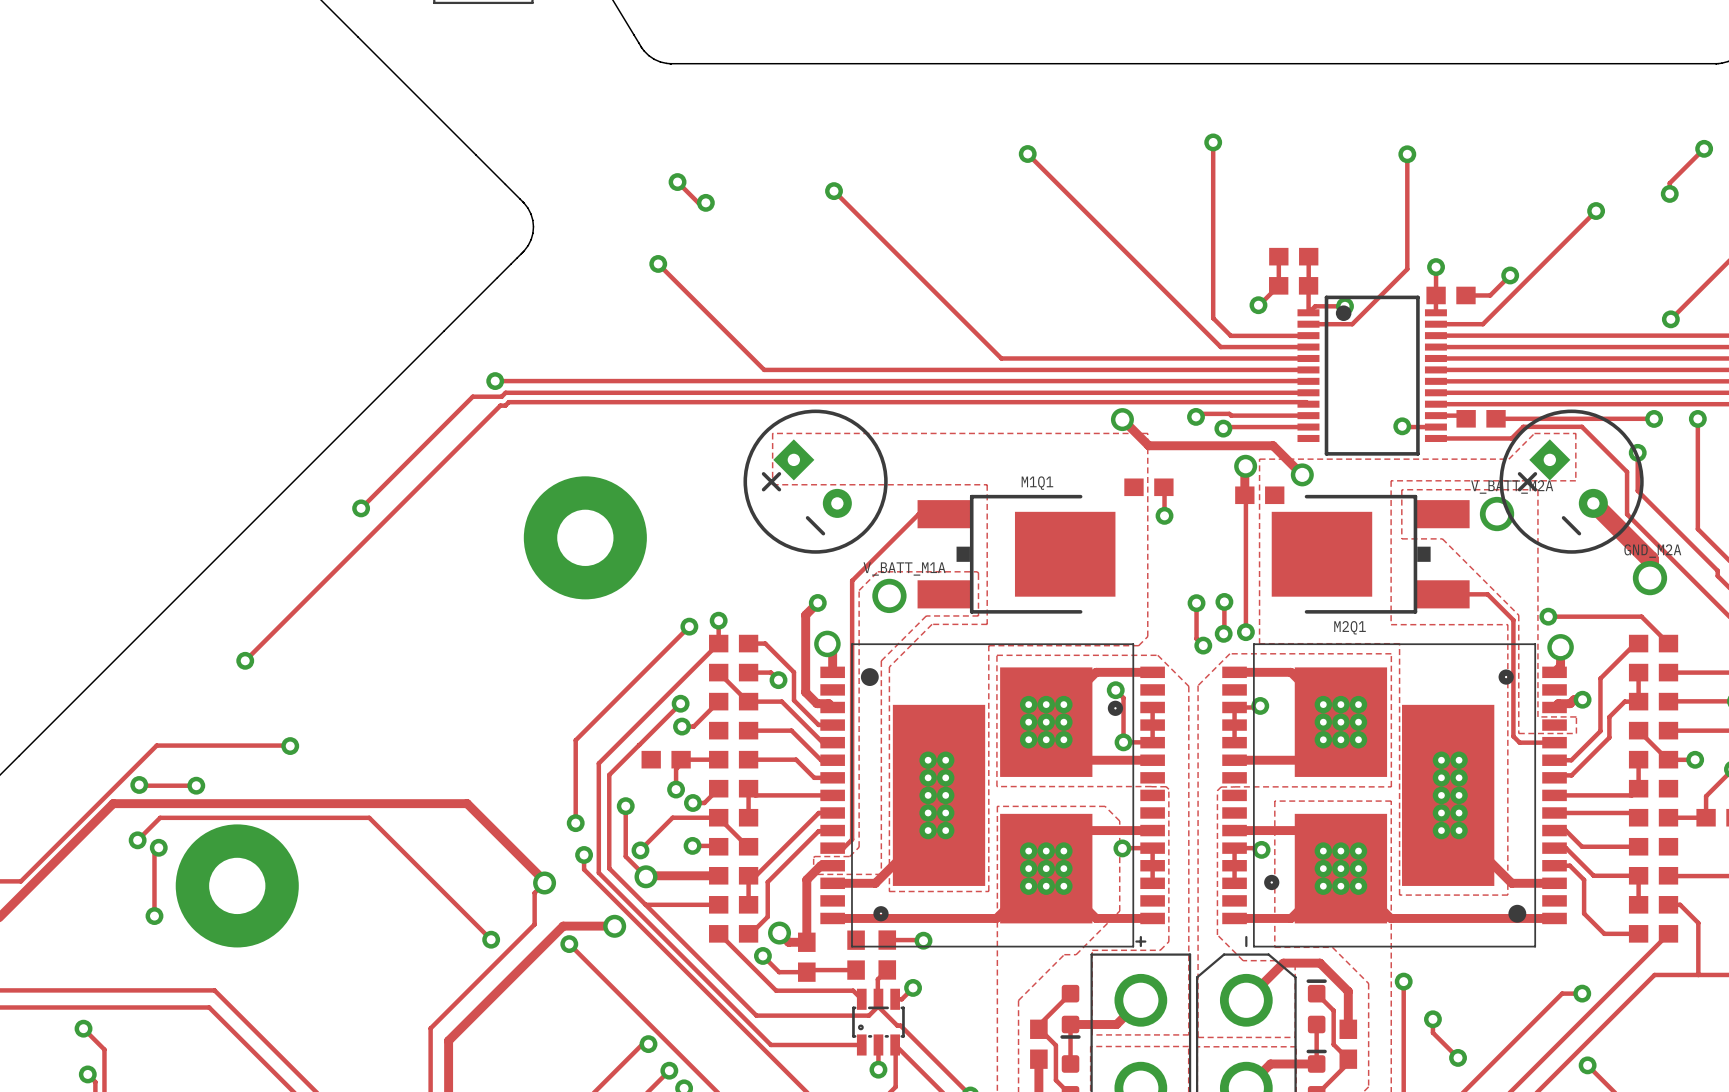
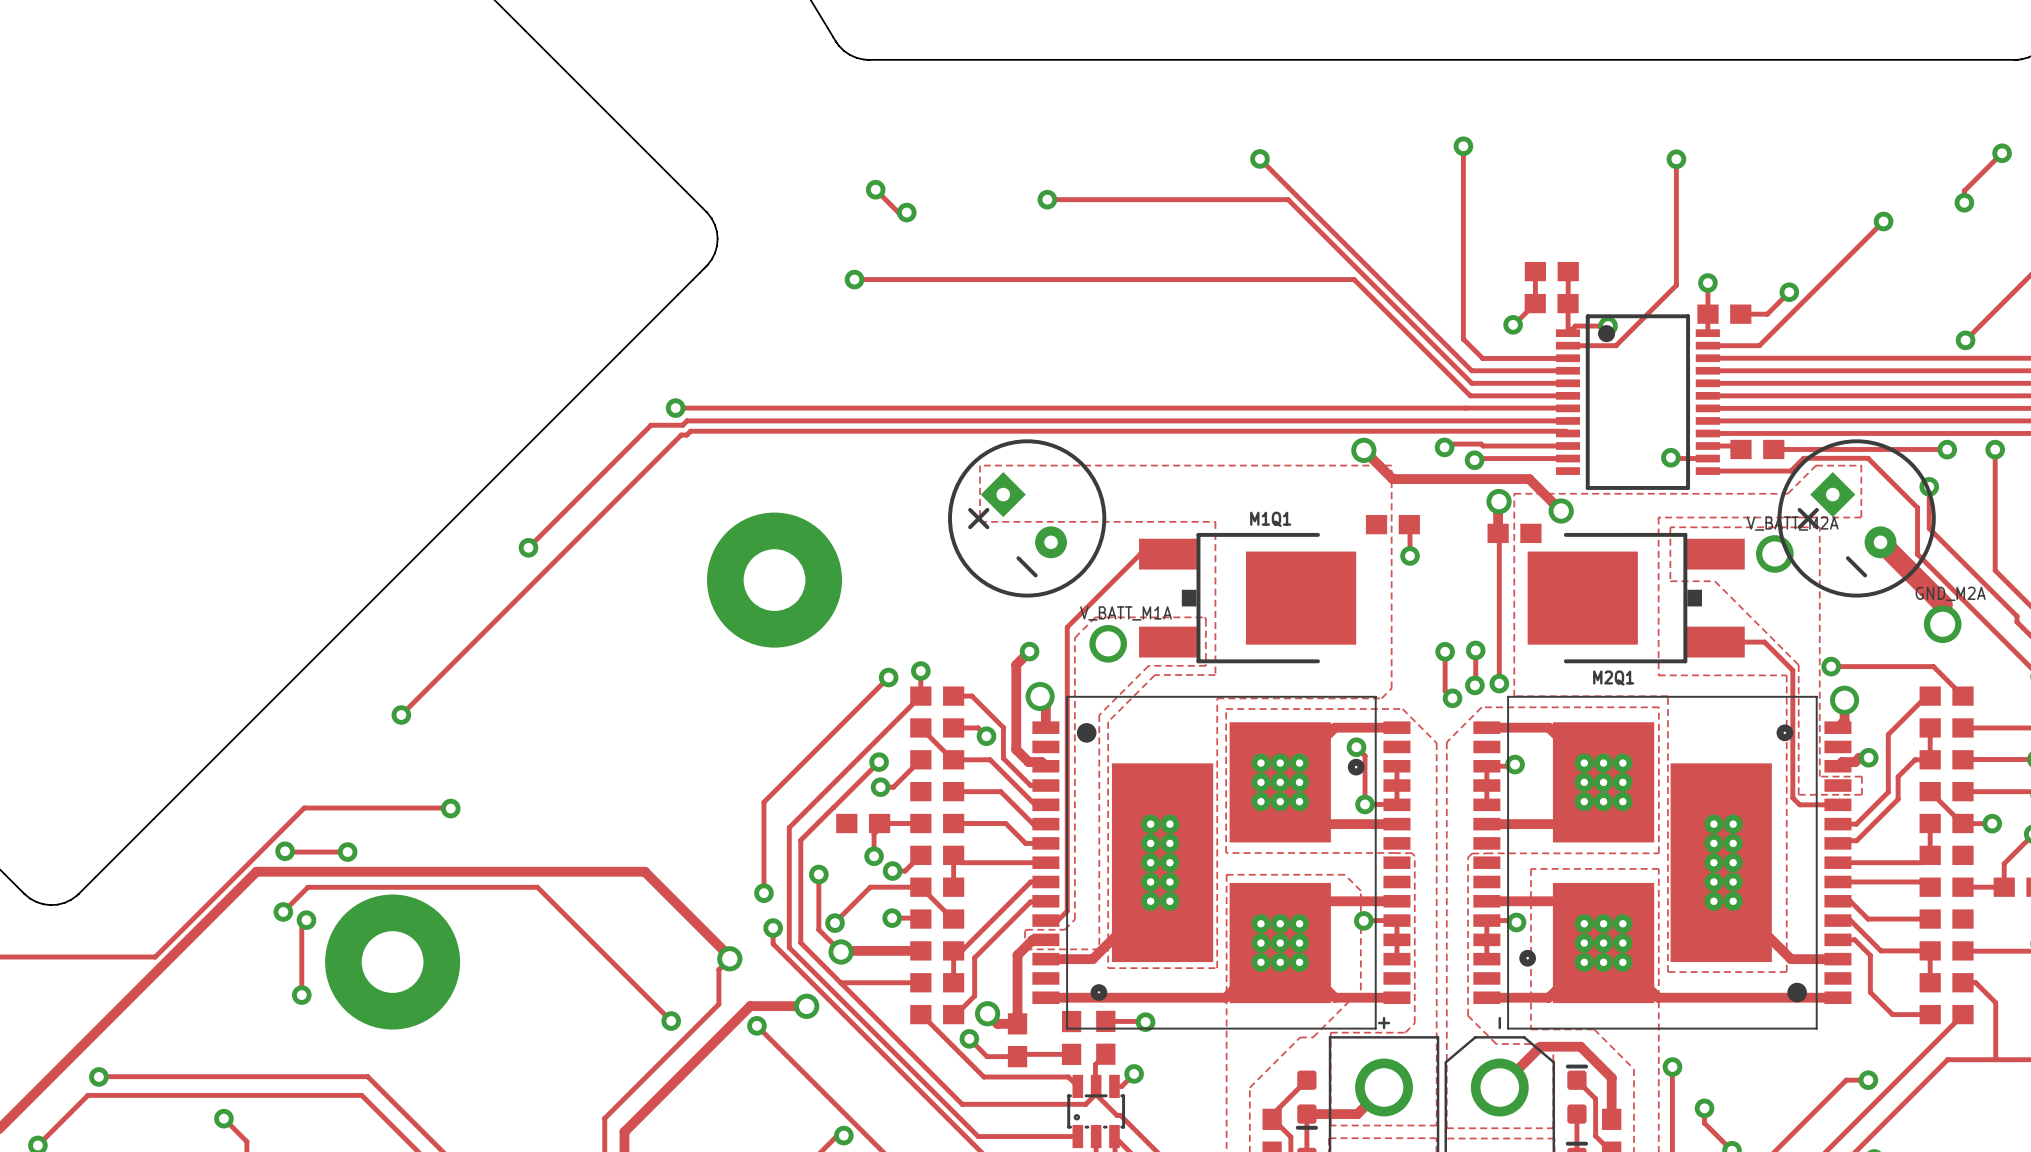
track: (834, 191) (1001, 358) (1220, 358) -> (1047, 199) (1288, 199) (1471, 383)
track: (658, 263) (764, 369) (1219, 369) -> (854, 279) (1354, 279) (1470, 395)

